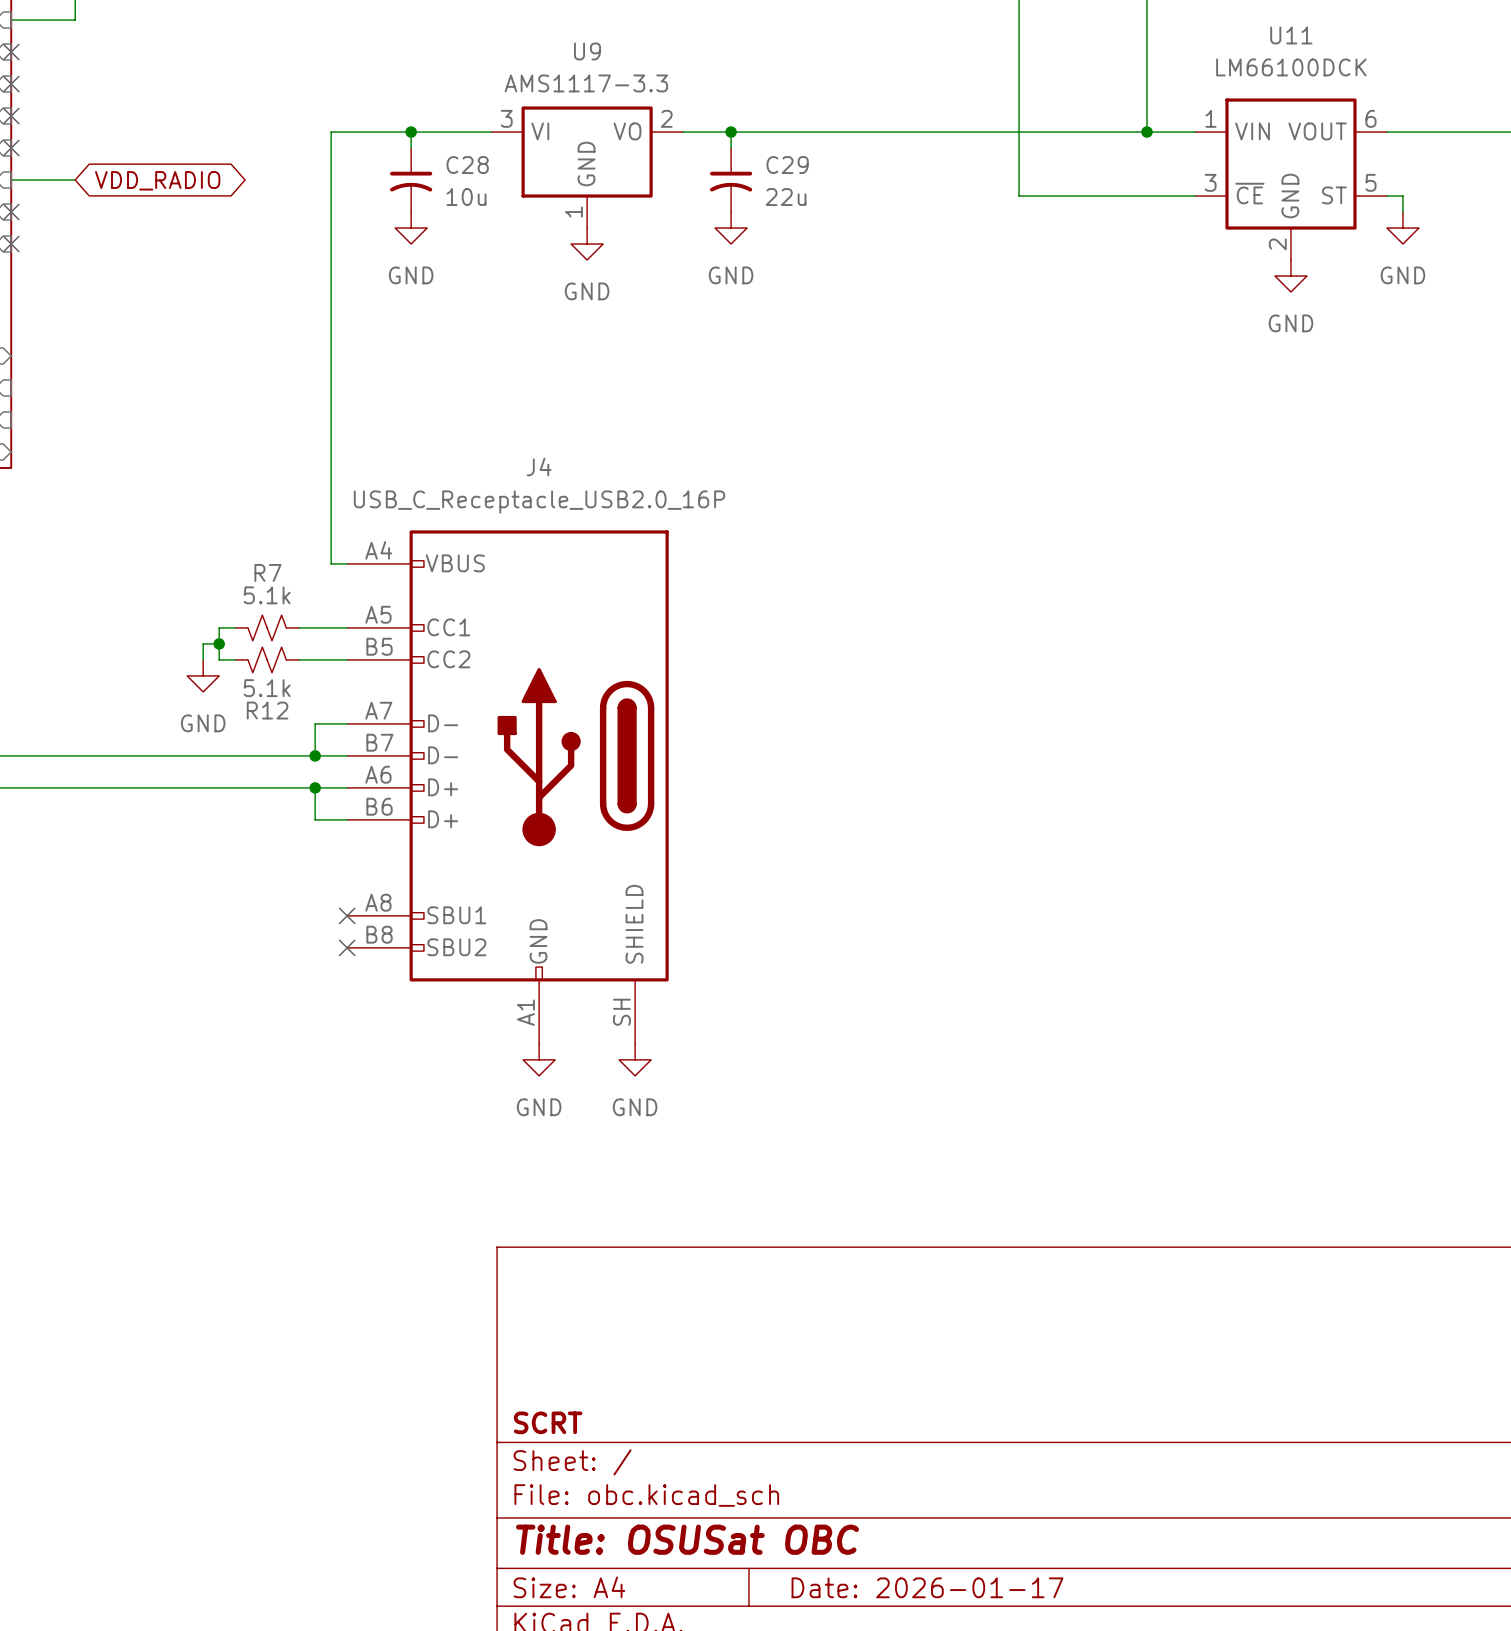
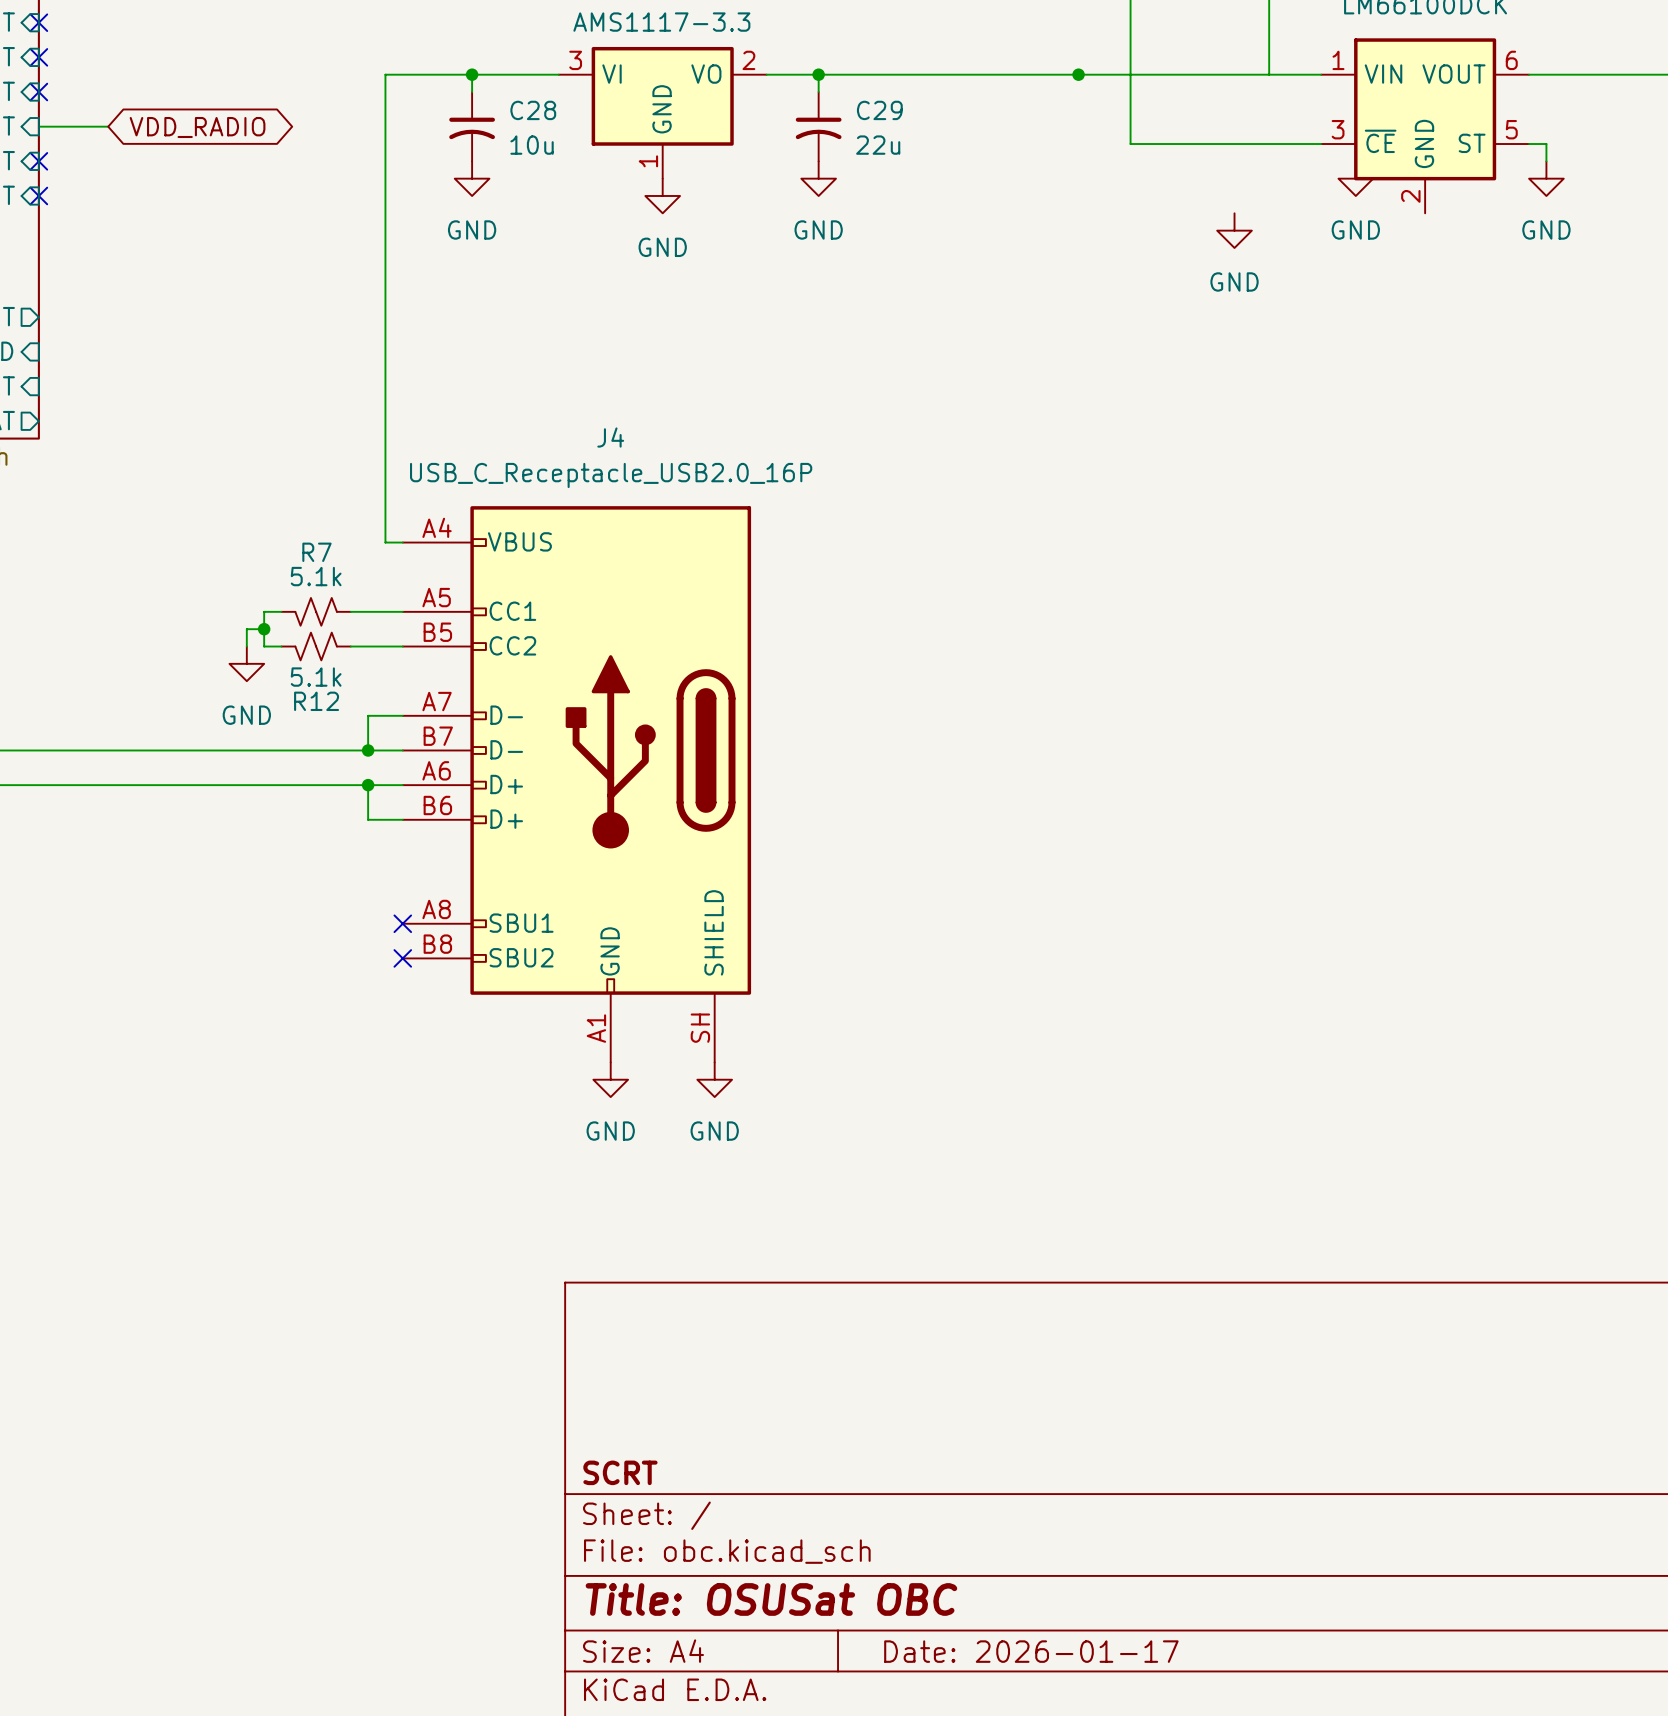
junction: none -> (1078, 74)
junction: (1147, 132) -> none
power symbol: none -> GND (1234, 230)
power symbol position: GND (1290, 276) -> GND (1355, 178)

